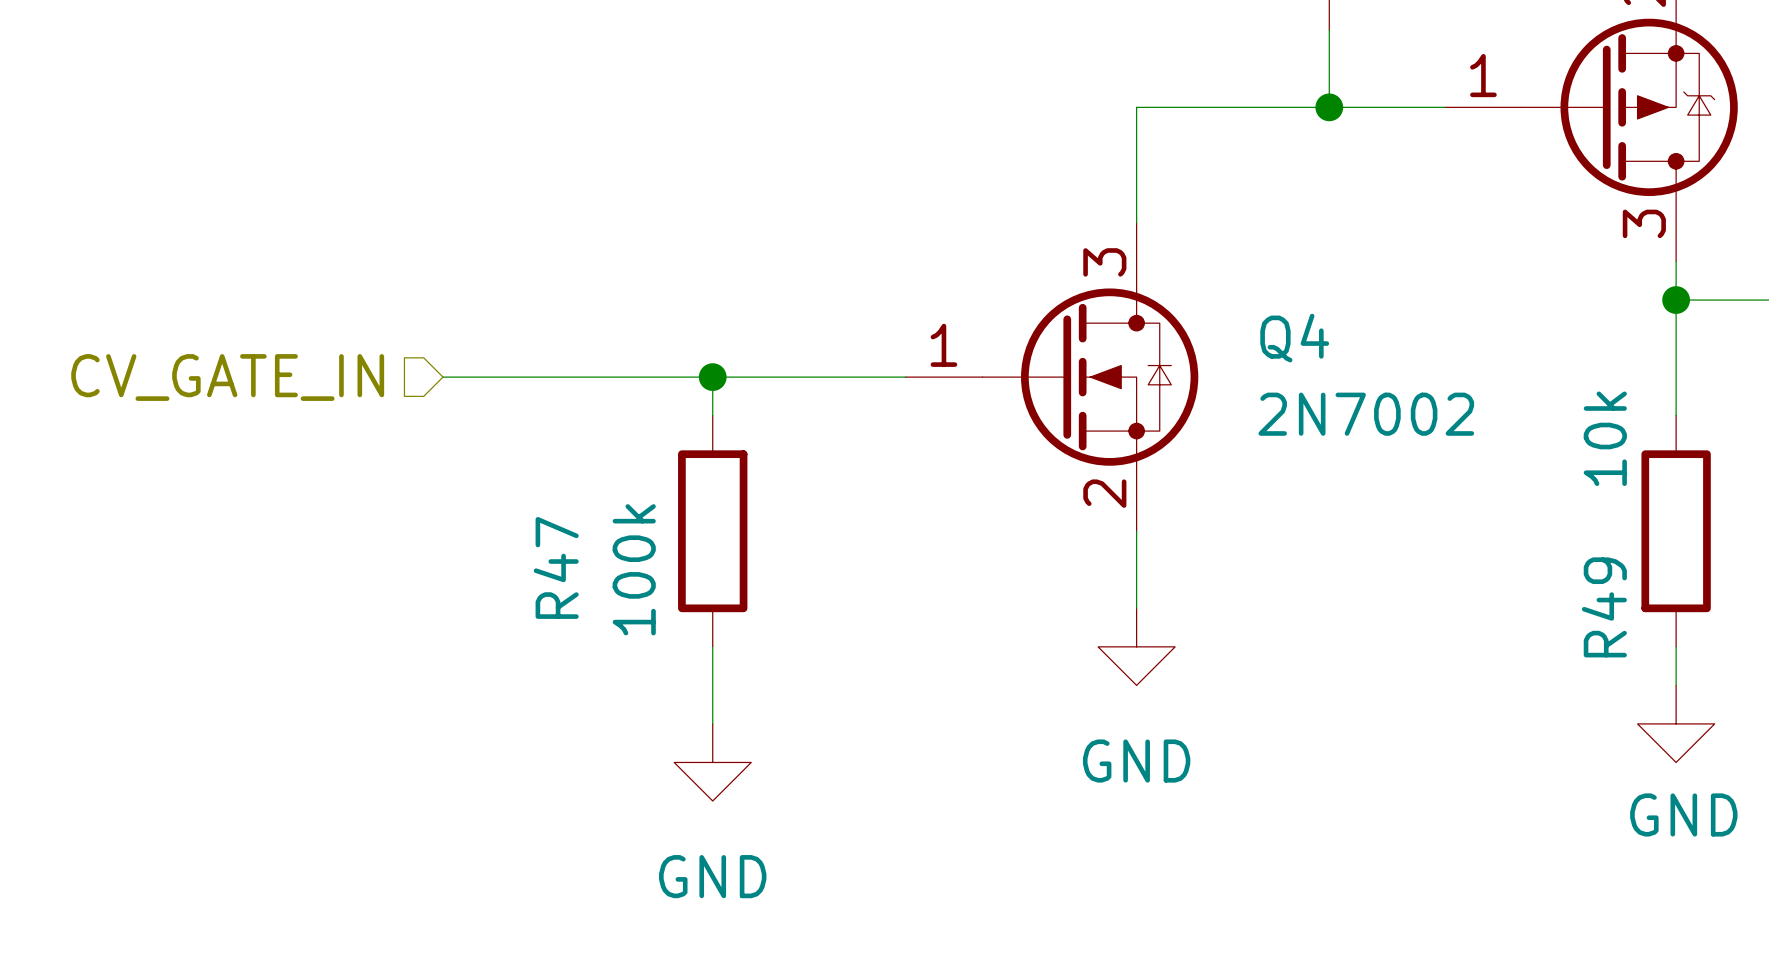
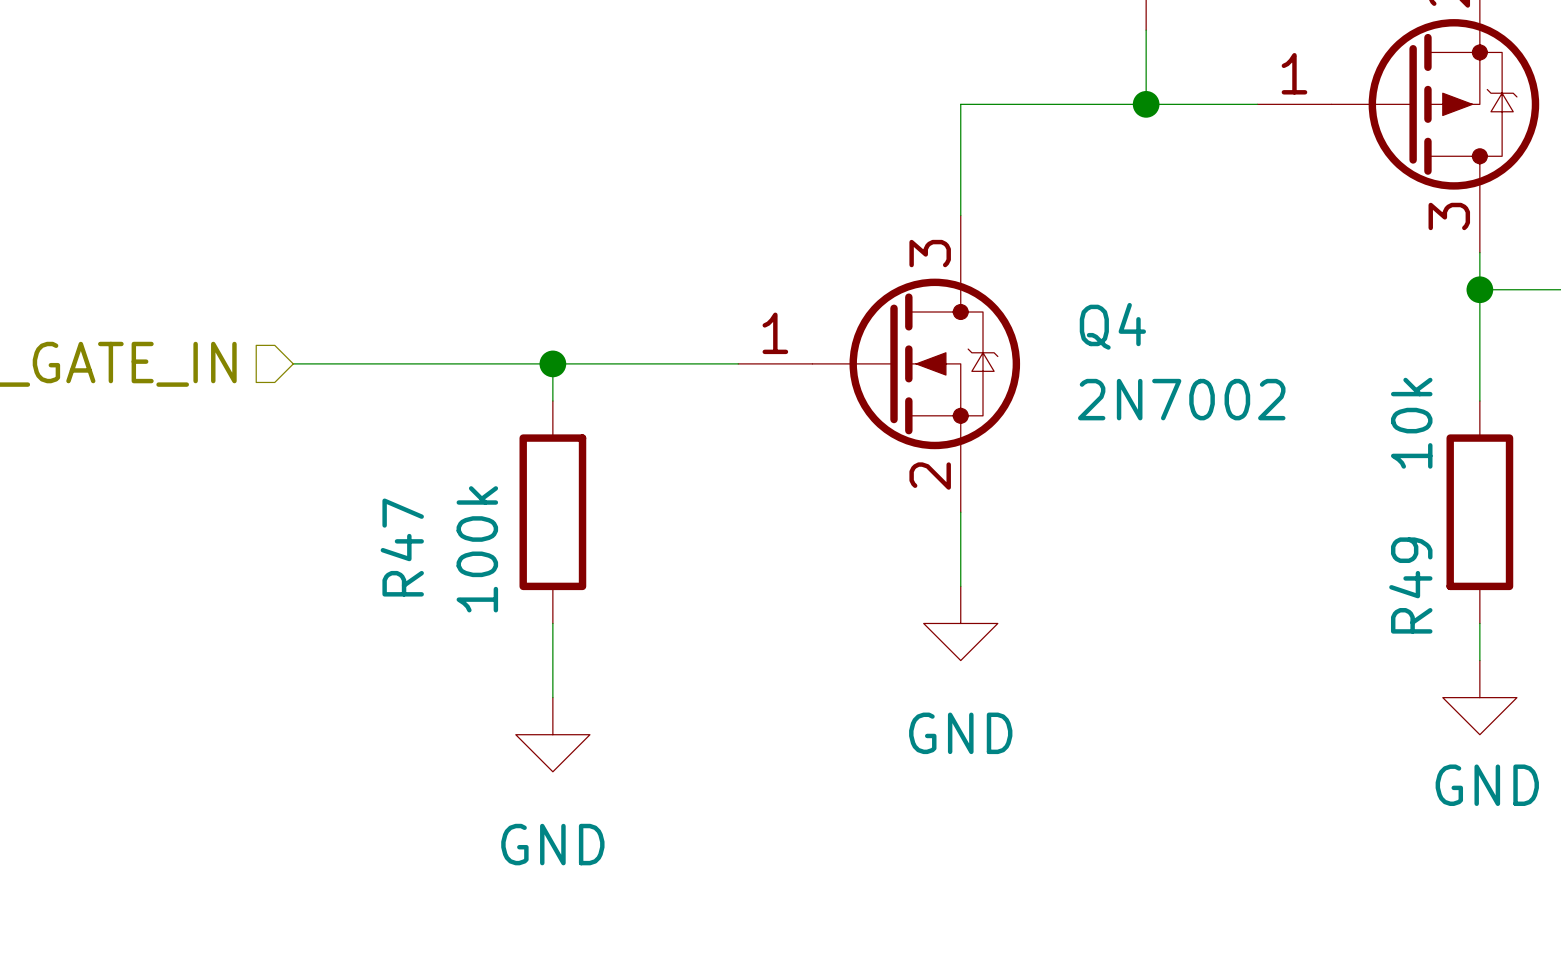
Q4 symbol: [905, 222, 1199, 532] -> [738, 215, 1021, 513]

